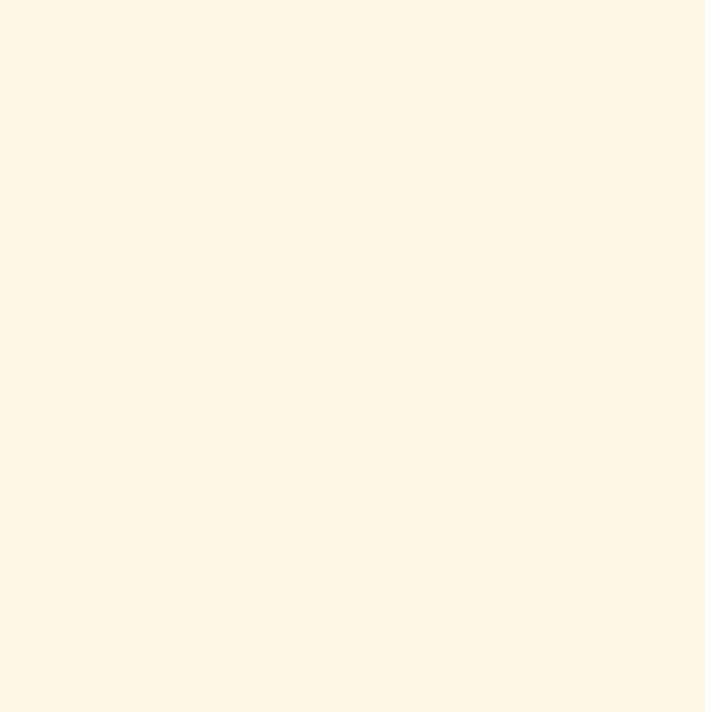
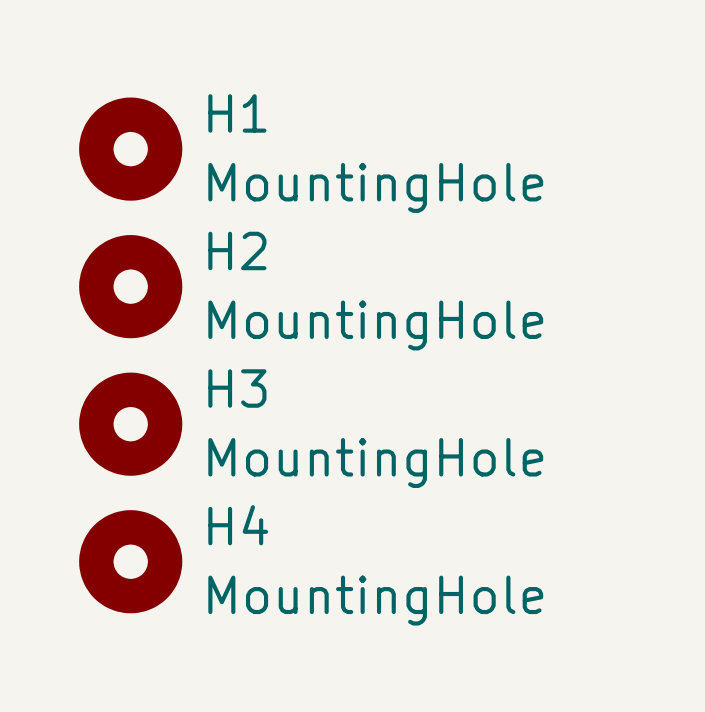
H1: none -> MountingHole (130, 149)
H2: none -> MountingHole (130, 286)
H3: none -> MountingHole (130, 424)
H4: none -> MountingHole (130, 561)

